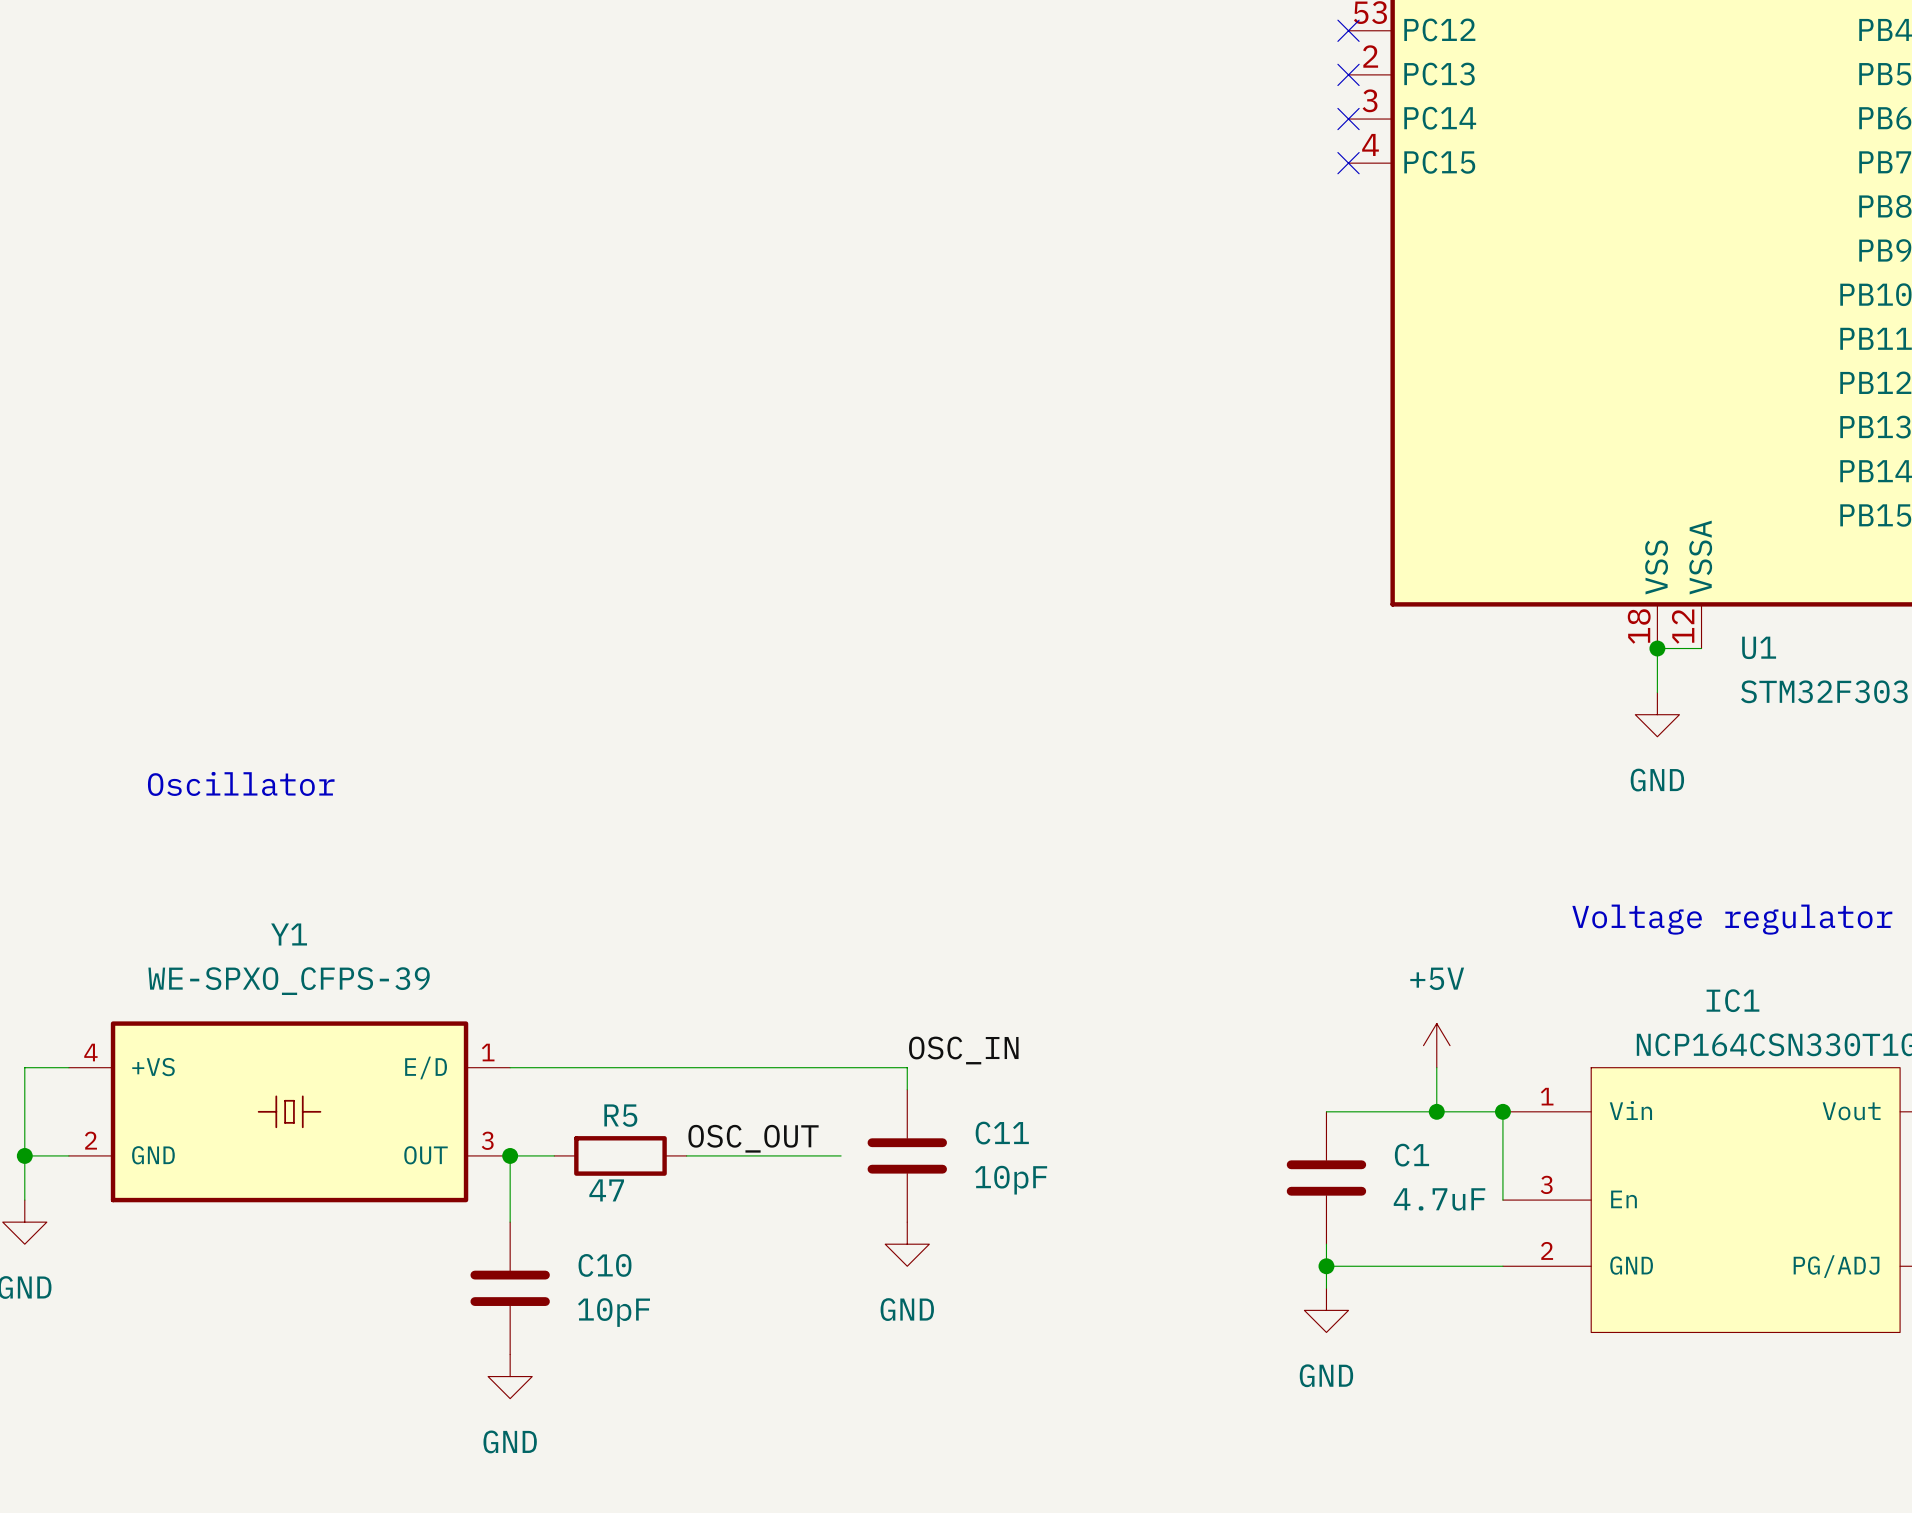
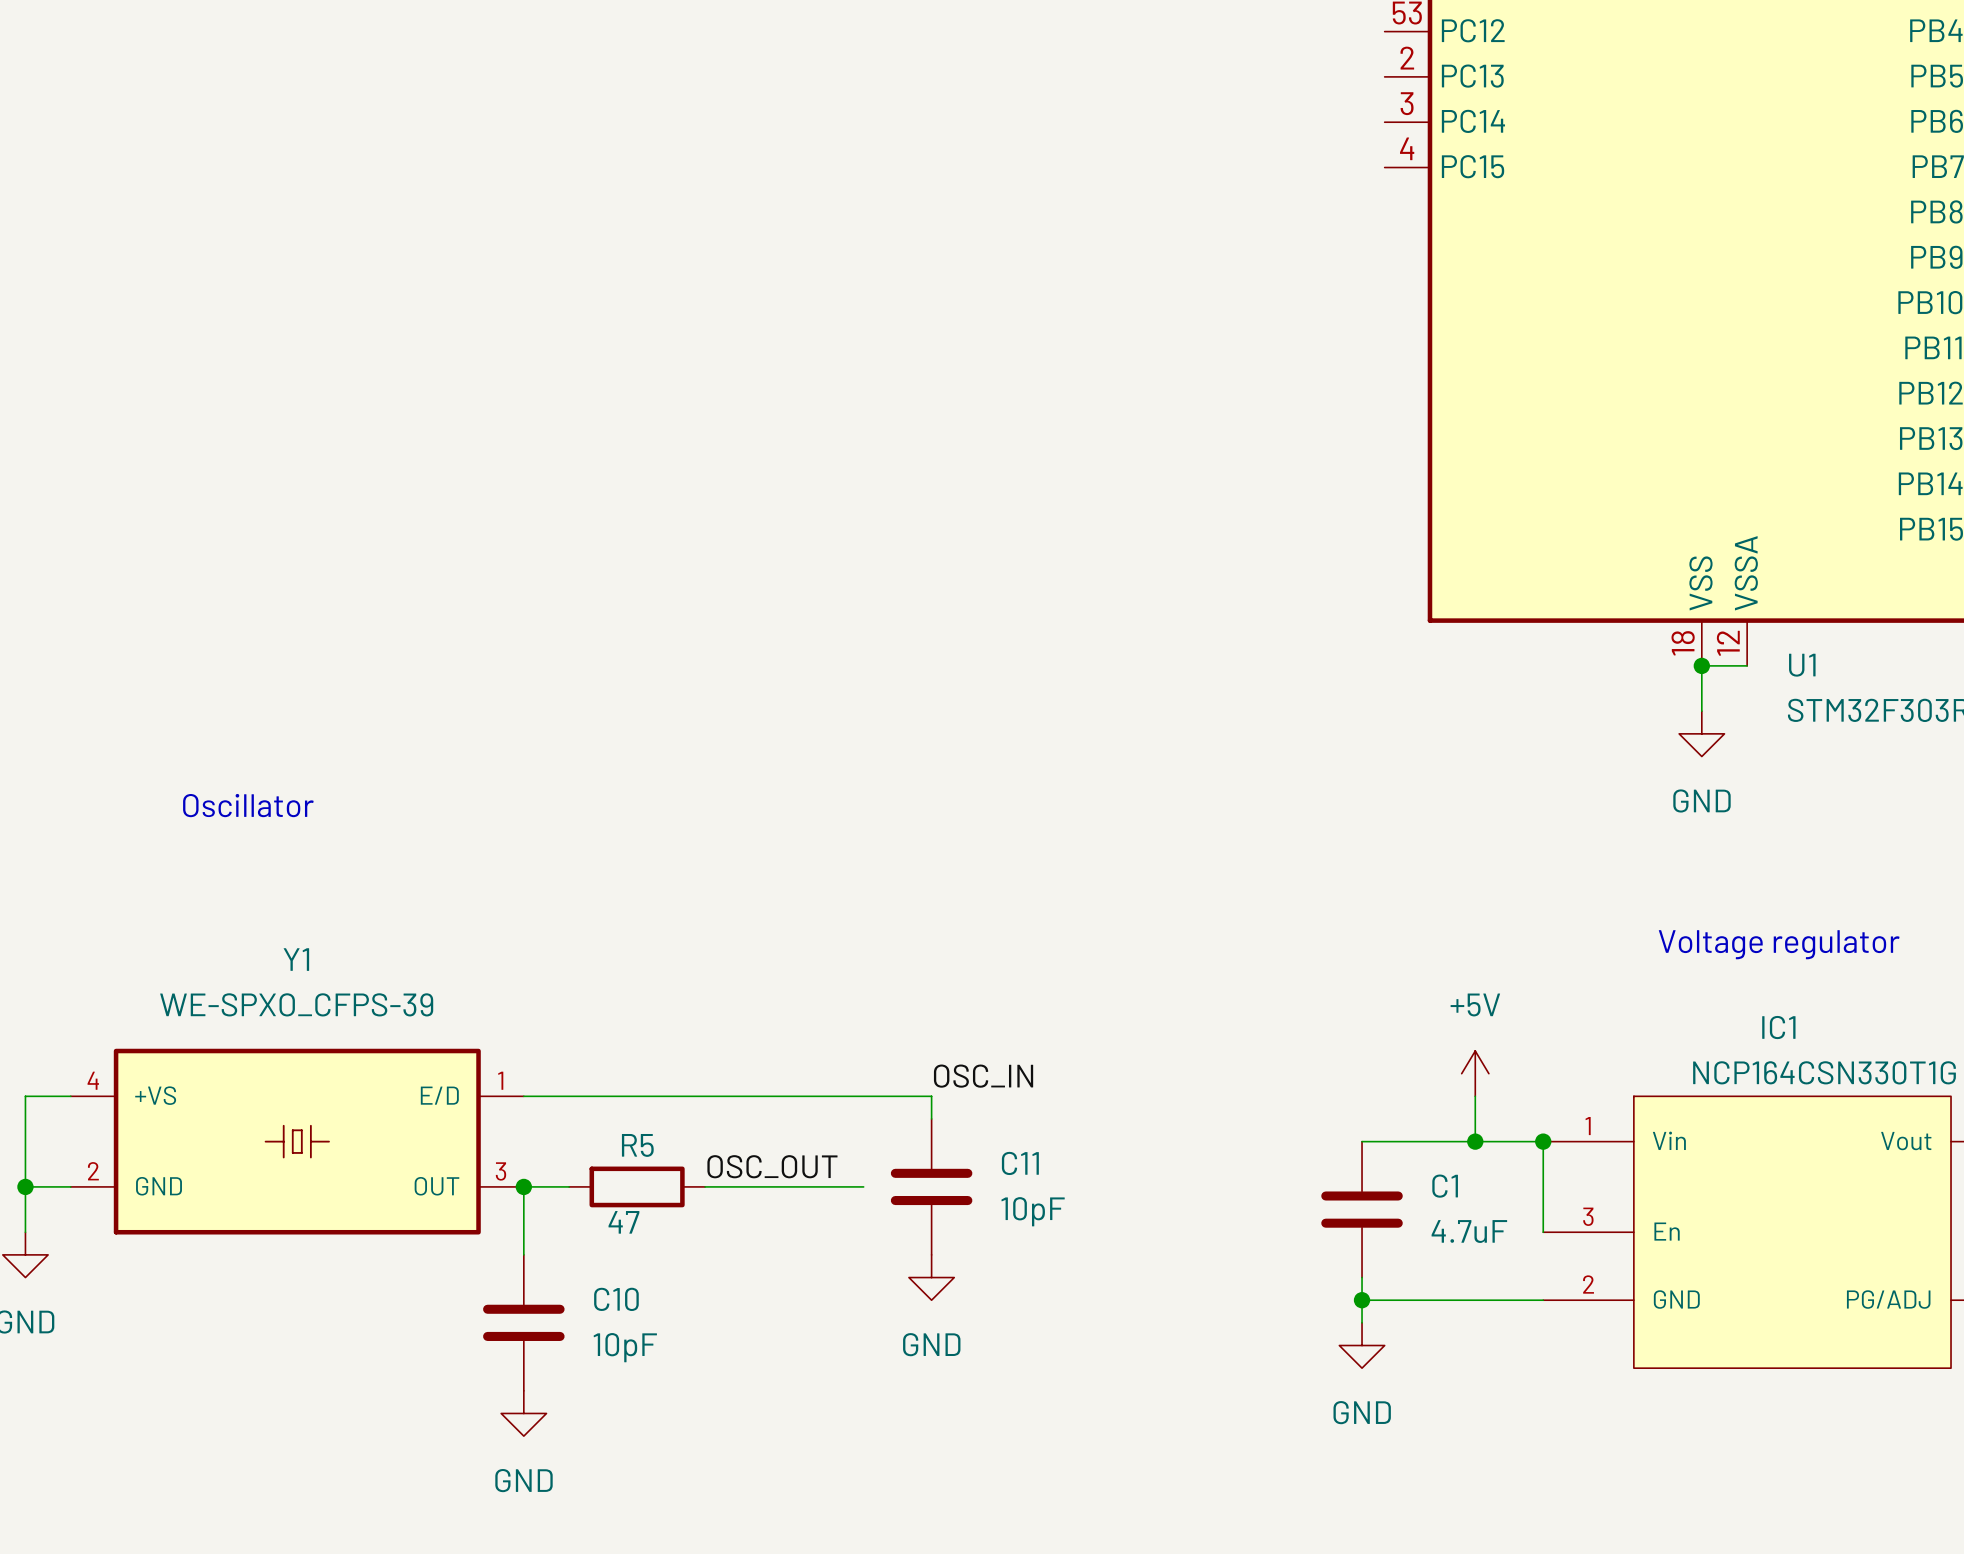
no-connect mark: (1348, 30) -> none
no-connect mark: (1348, 74) -> none
no-connect mark: (1348, 119) -> none
no-connect mark: (1348, 163) -> none

